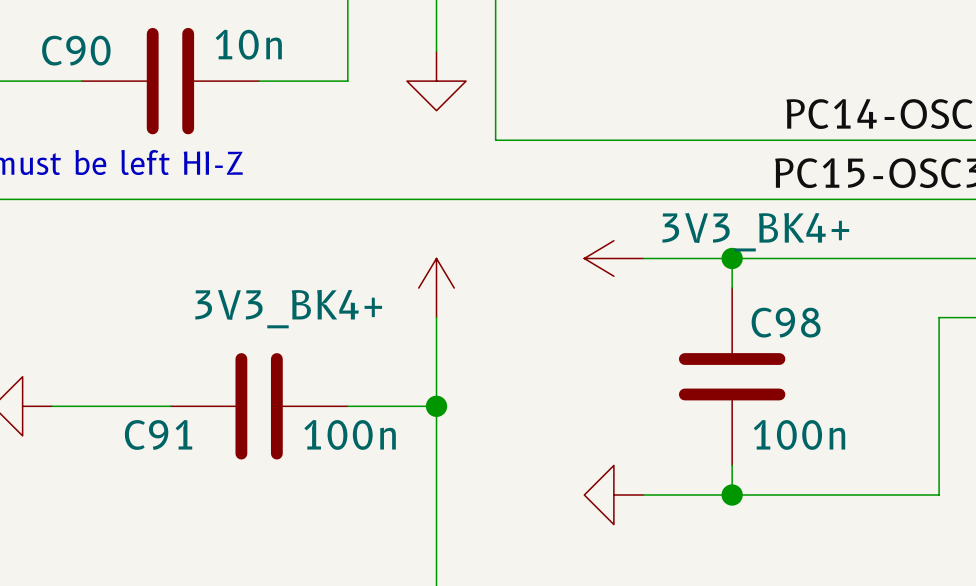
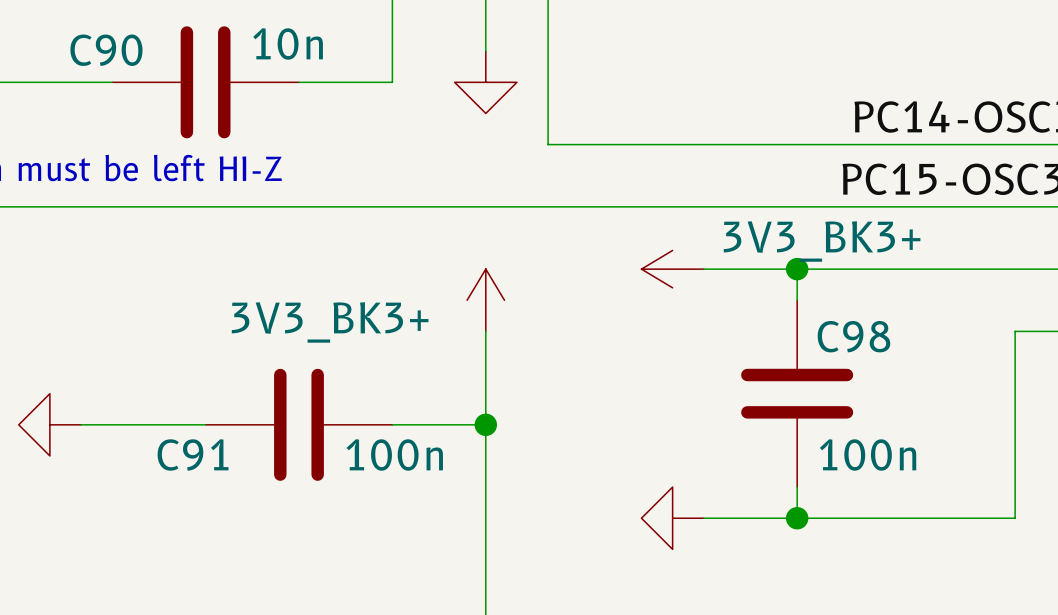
power symbol: 3V3_BK4+ (613, 258) -> 3V3_BK3+ (672, 269)
power symbol: 3V3_BK4+ (436, 288) -> 3V3_BK3+ (485, 300)

